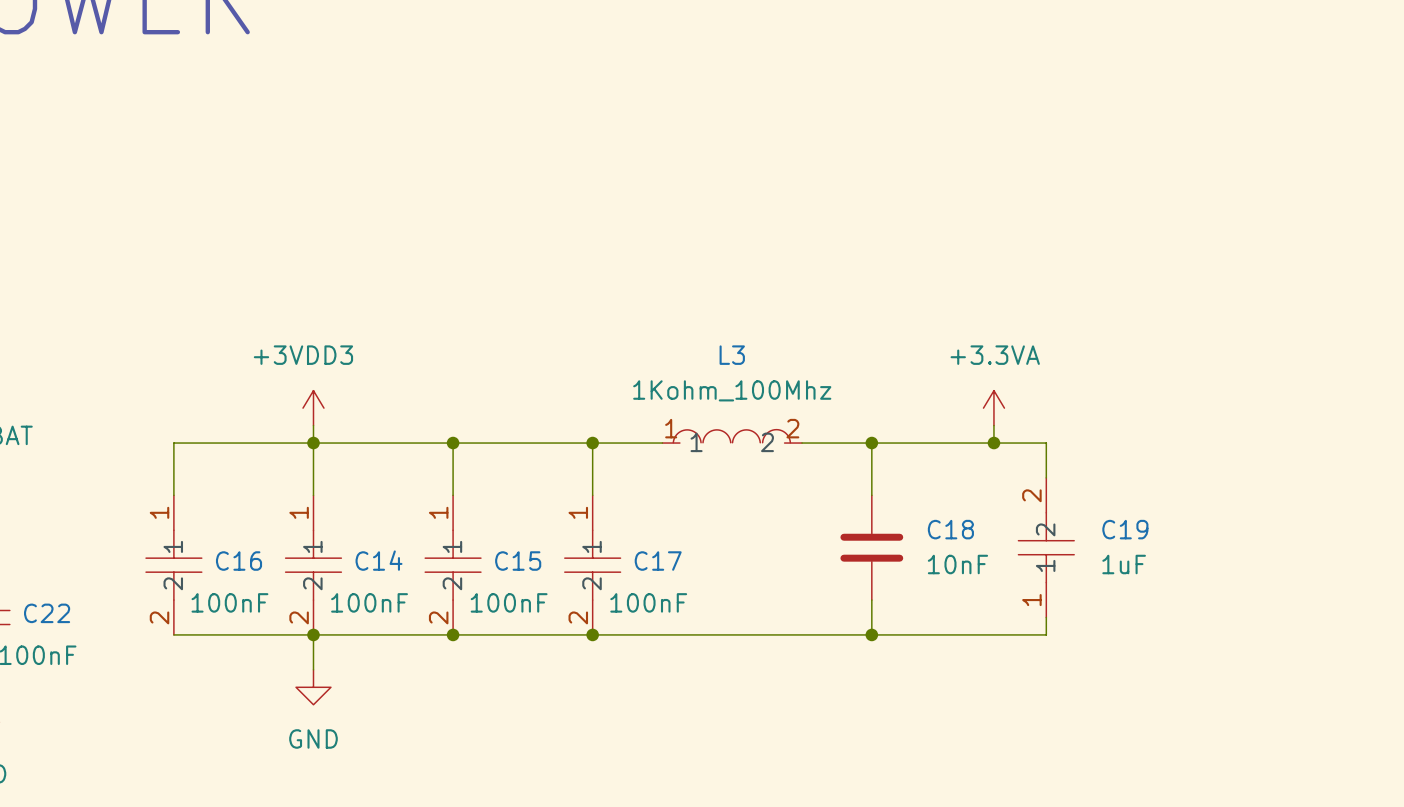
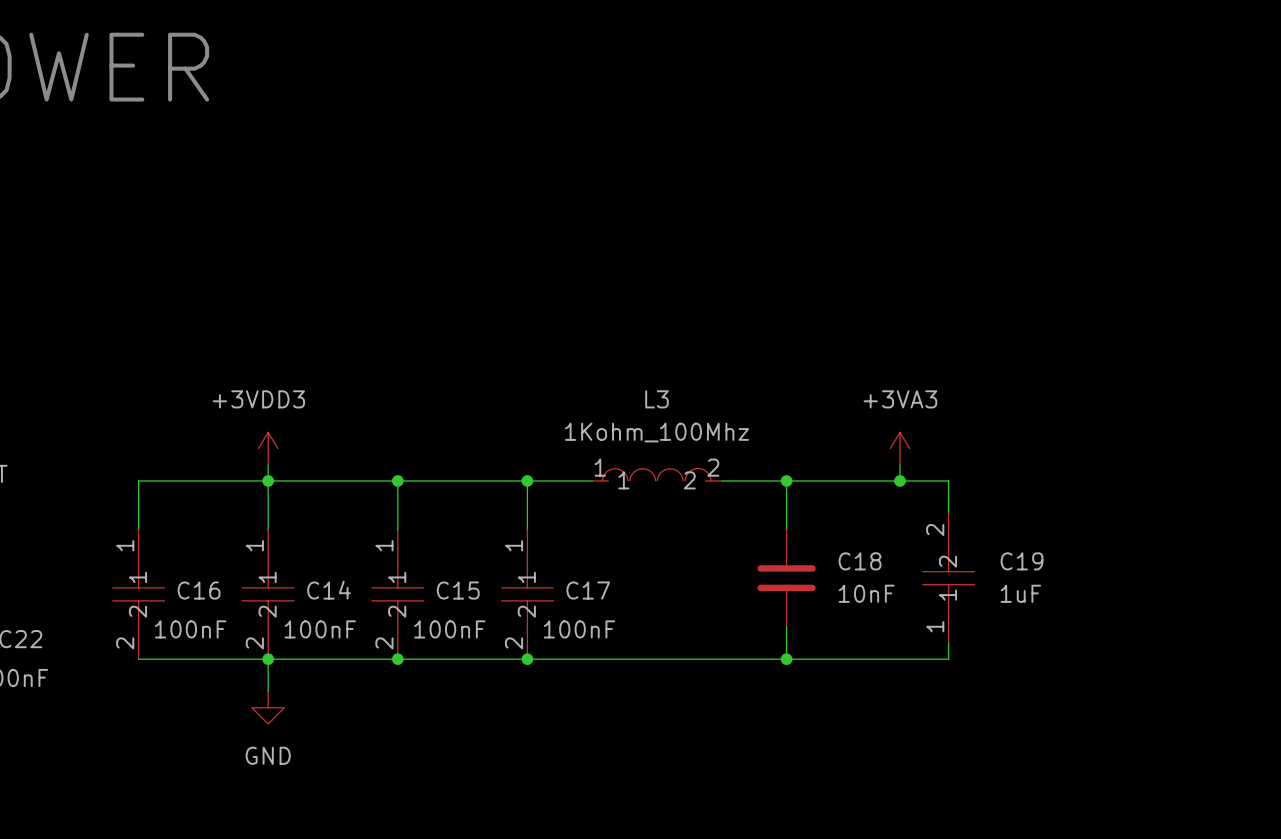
power symbol: +3.3VA (993, 408) -> +3VA3 (900, 448)

